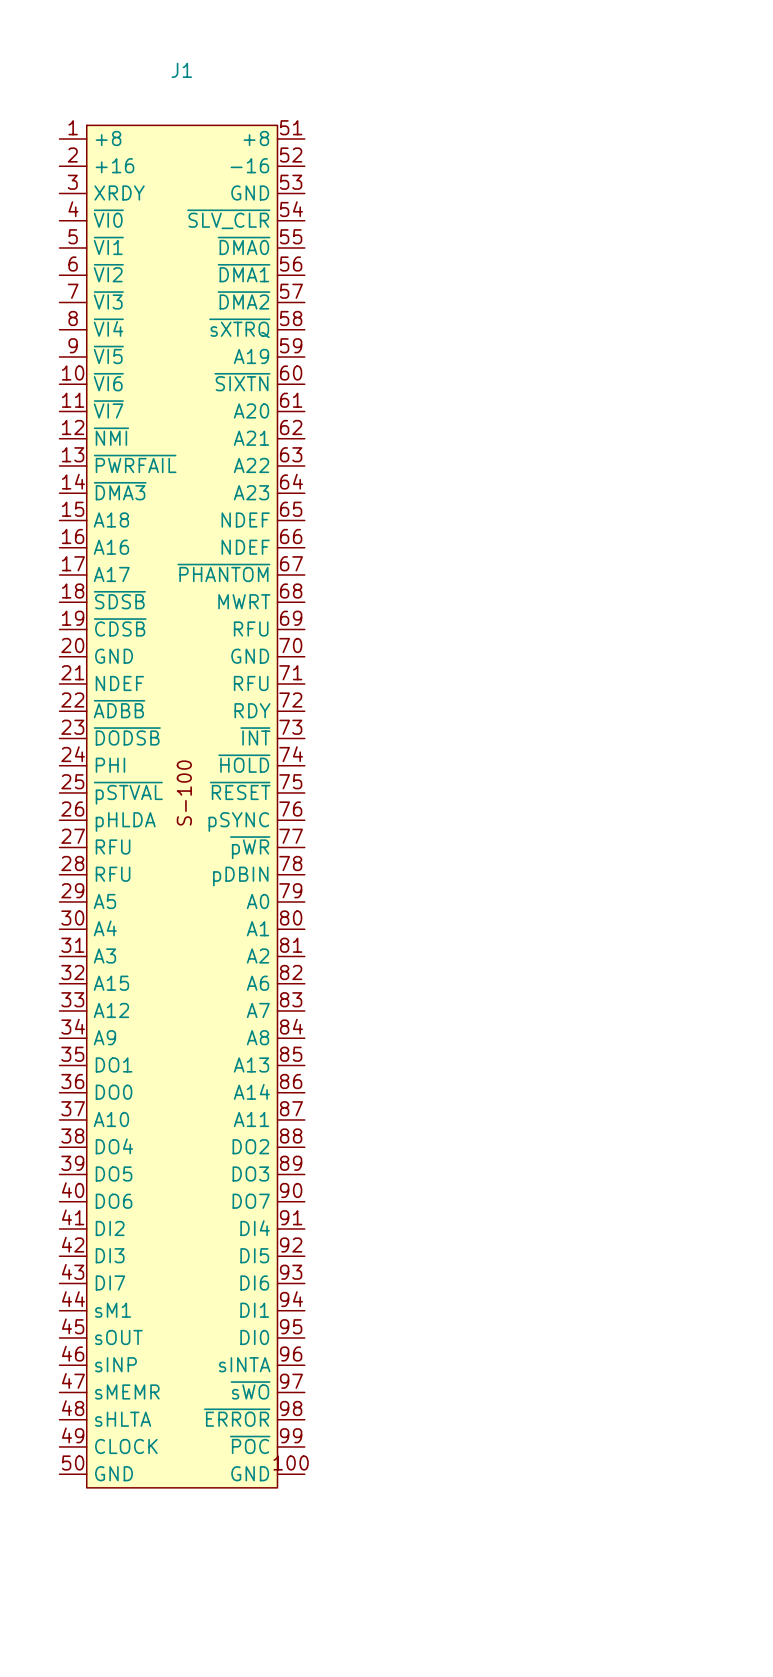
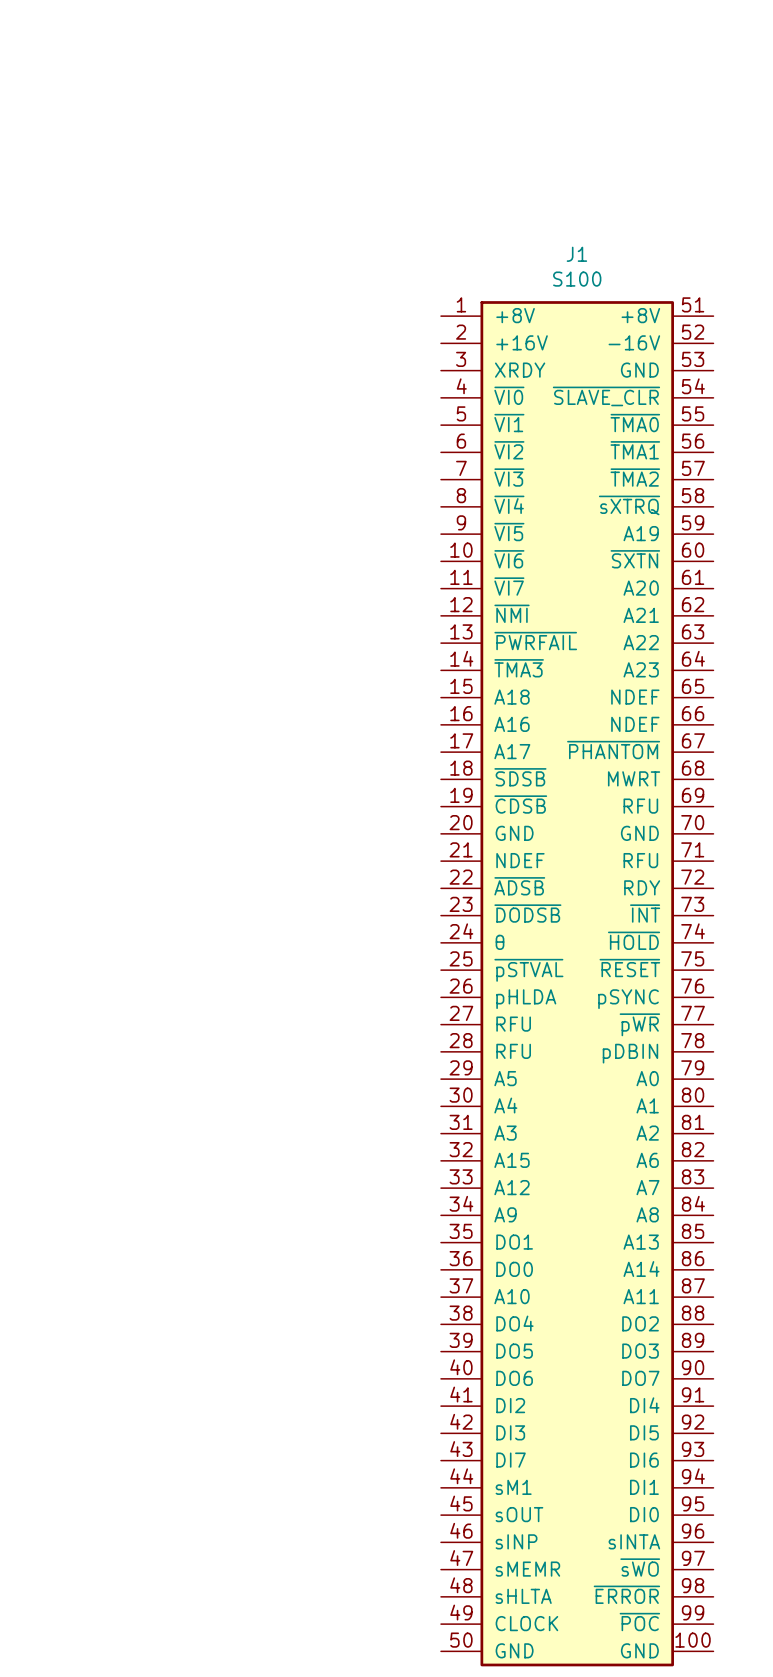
J1 symbol: [59, 125, 305, 1488] -> [440, 301, 714, 1667]
J1 value: none -> S100 (577, 279)

